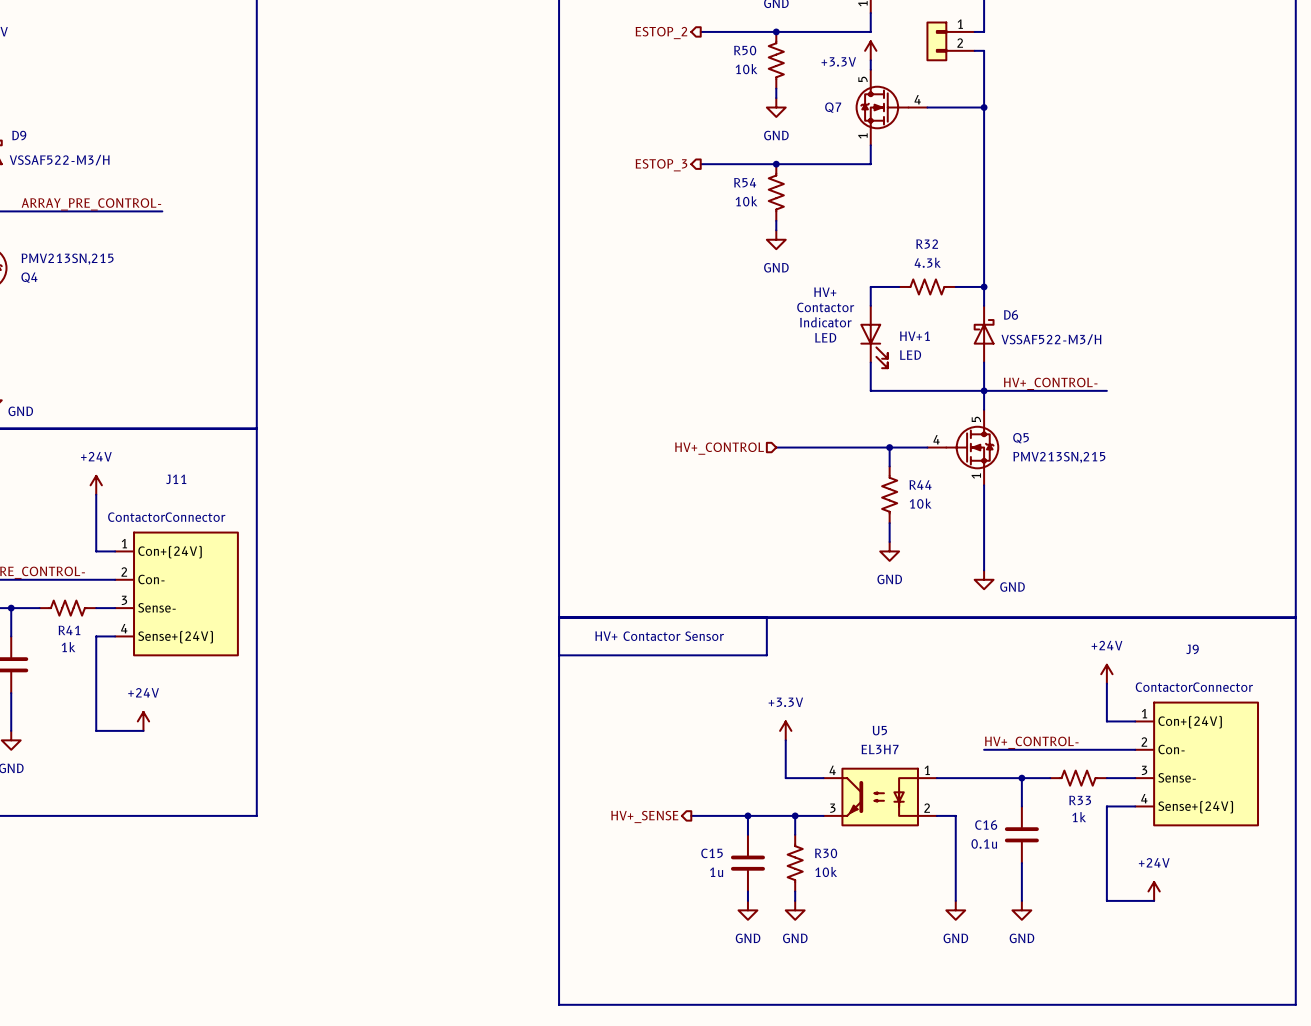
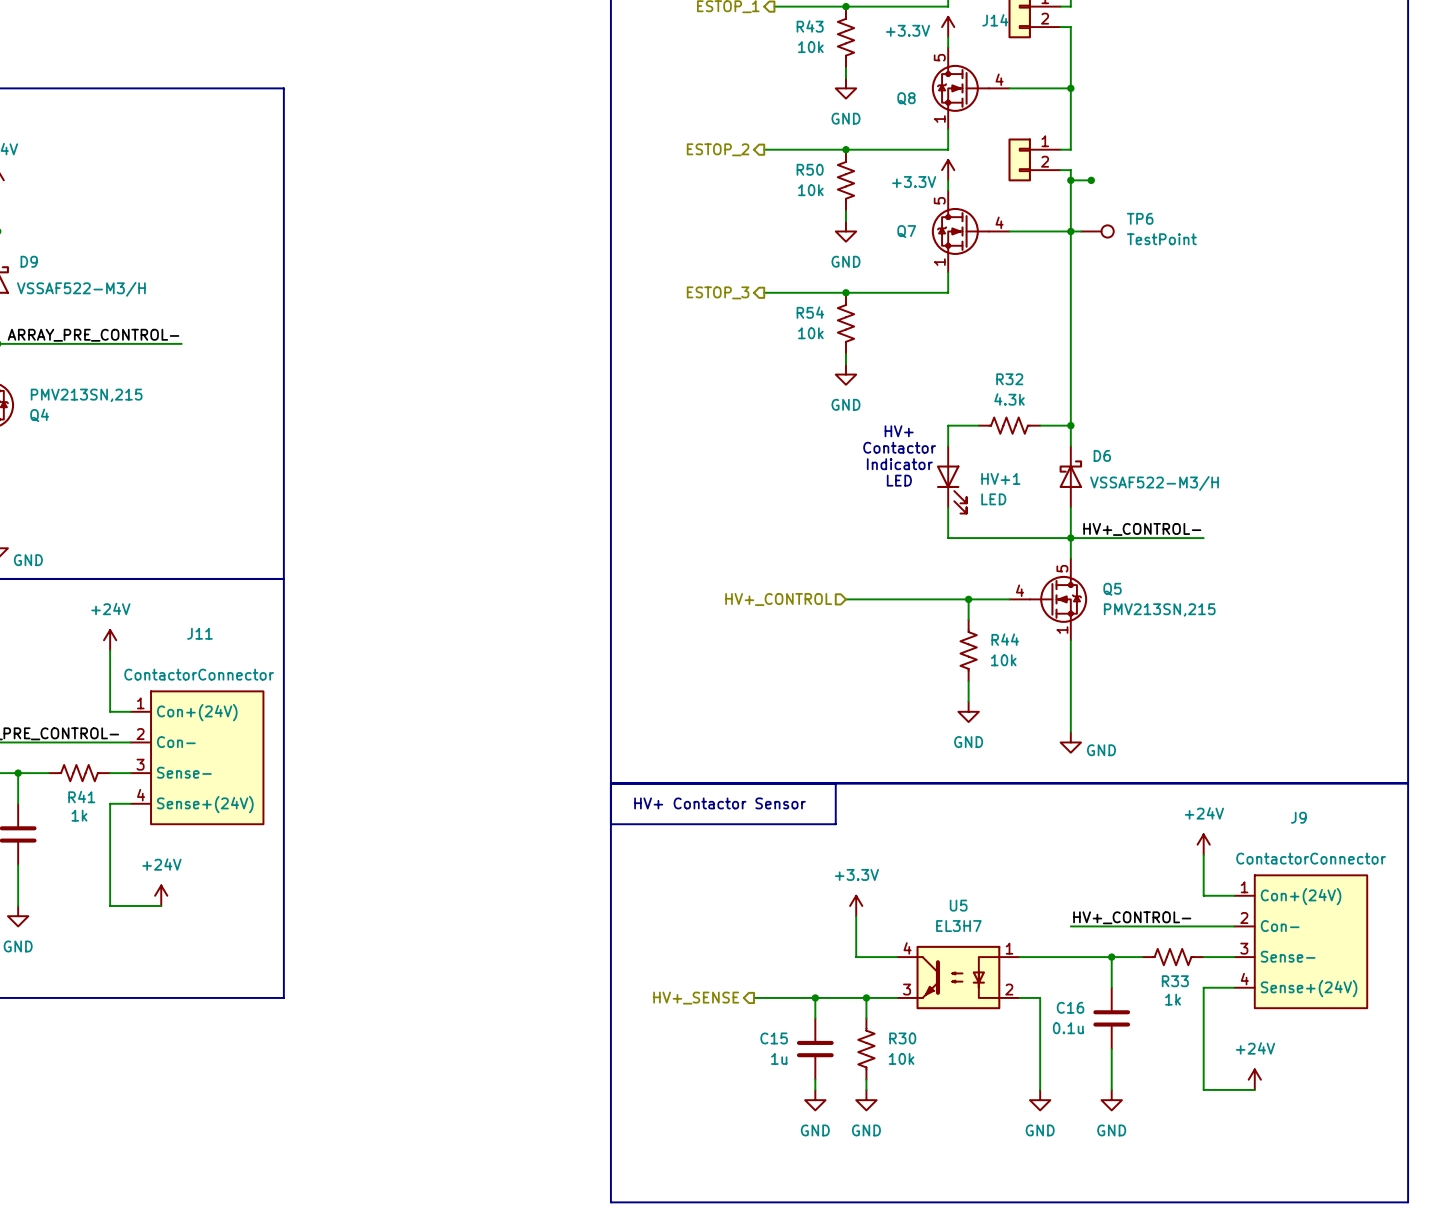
wire: none -> (1070, 180) (1091, 180)
junction: none -> (1070, 180)
junction: none -> (1091, 180)
wire: none -> (1070, 231) (1081, 231)
TP6: none -> TestPoint (1097, 231)
label position: HV+_CONTROL- (1050, 383) -> HV+_CONTROL- (1142, 529)

